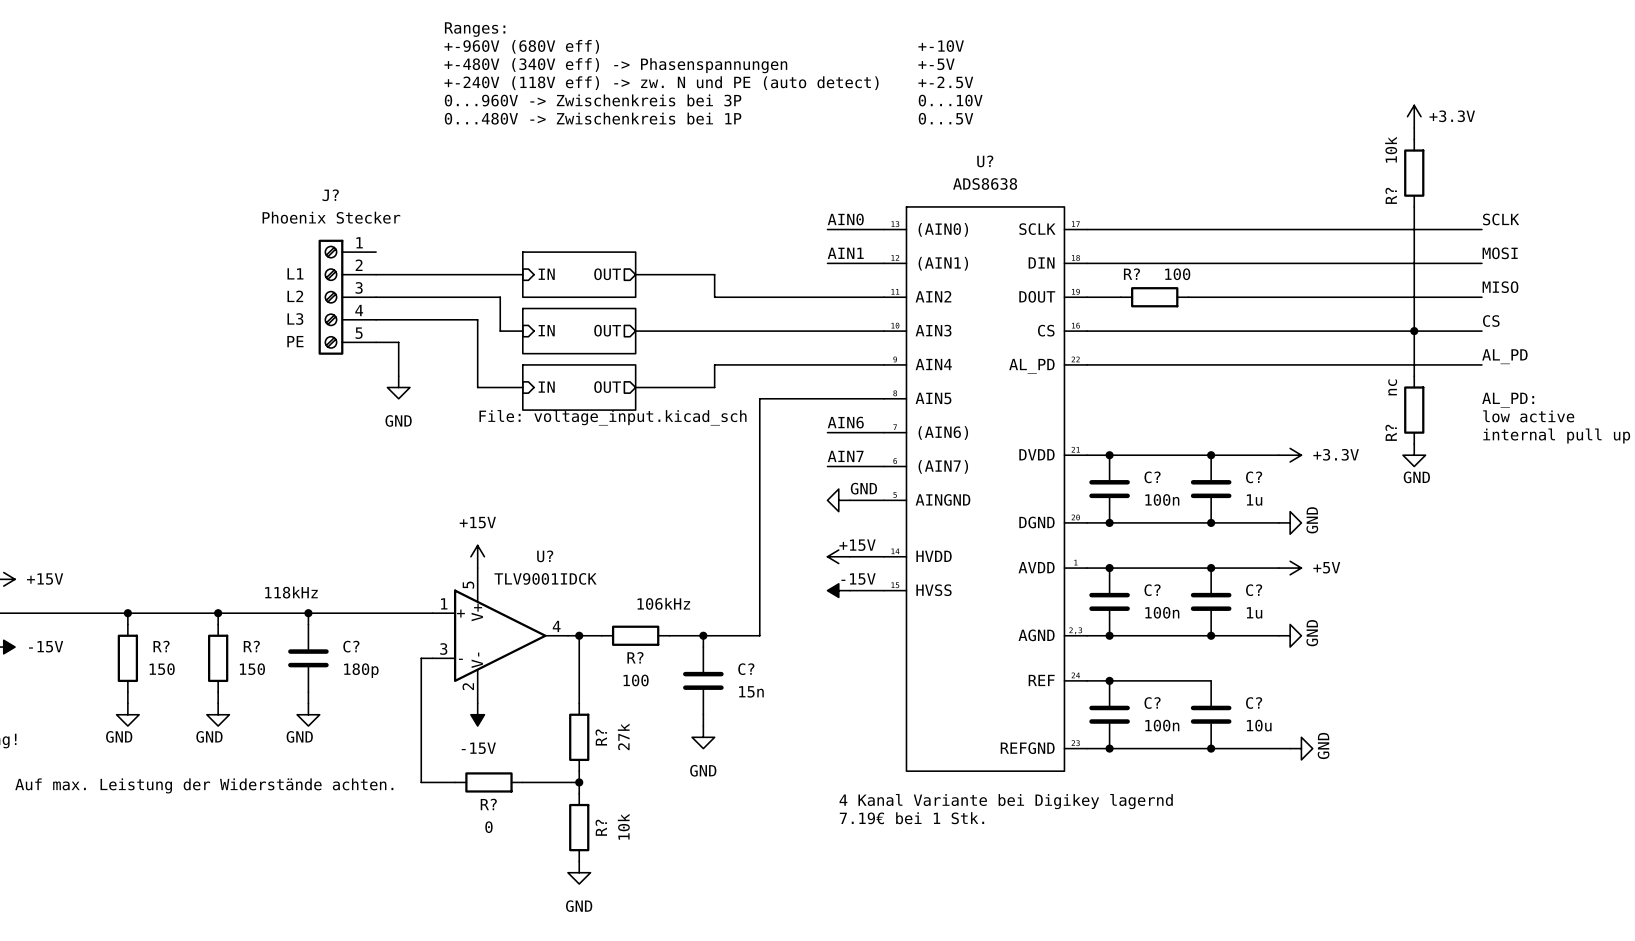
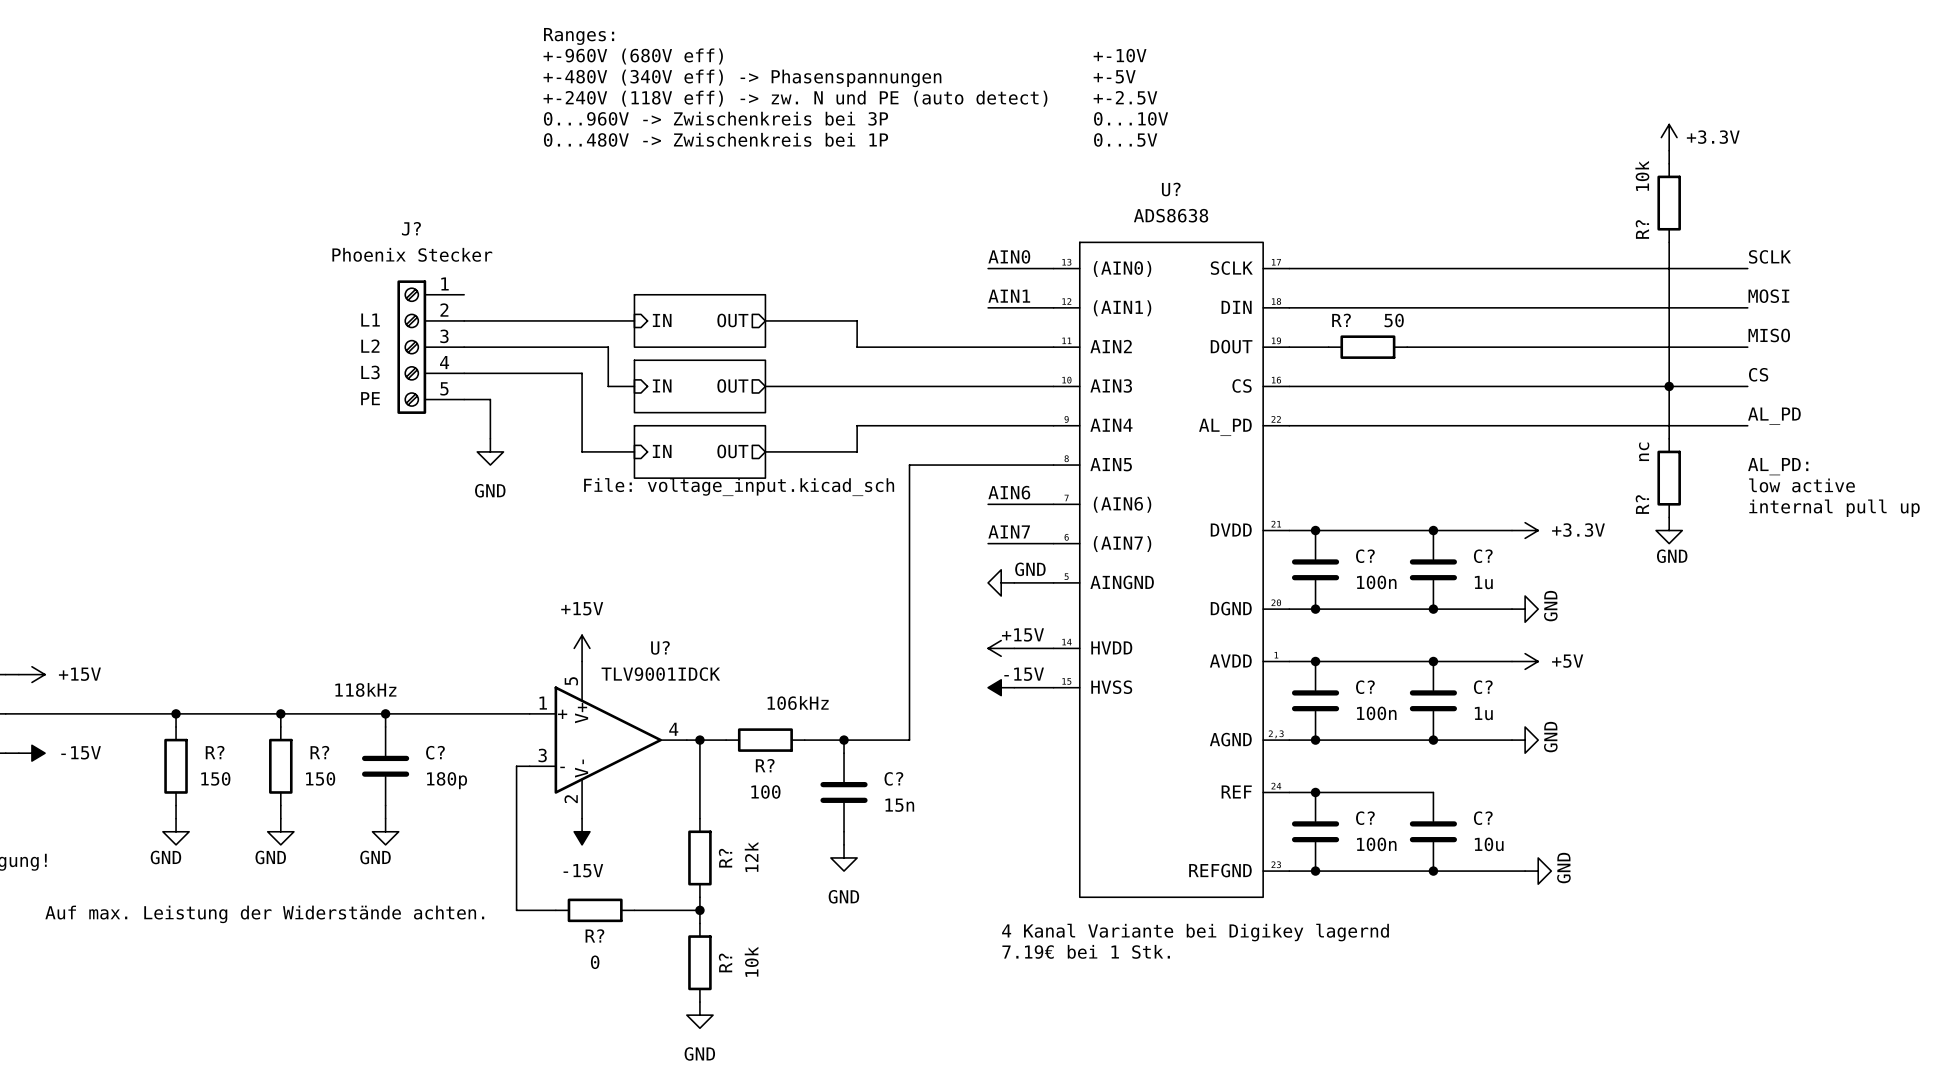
R? value: 100 (1177, 274) -> 50 (1394, 320)
R? value: 27k (623, 736) -> 12k (751, 857)

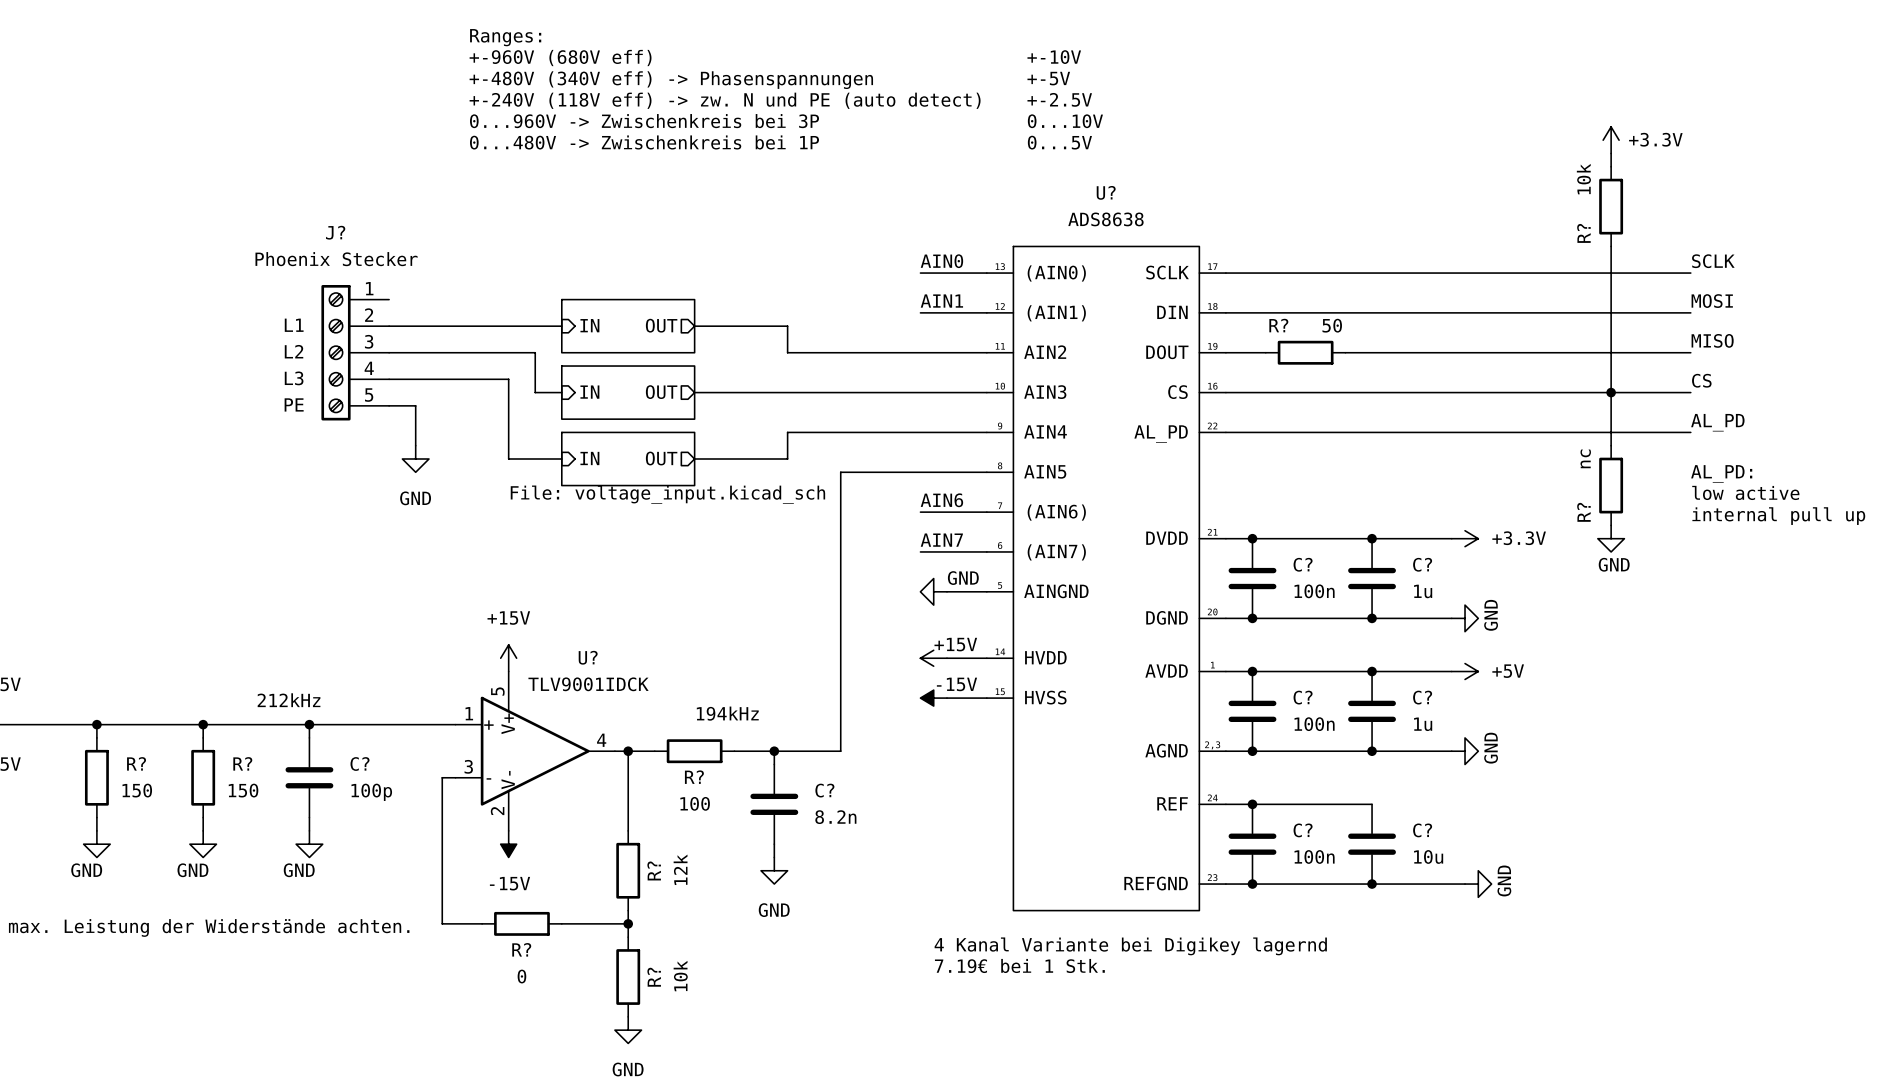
text: 118kHz (365, 689) -> 212kHz (289, 700)
text: 106kHz (798, 703) -> 194kHz (727, 713)
C? value: 180p (447, 780) -> 100p (371, 792)
C? value: 15n (899, 805) -> 8.2n (835, 817)

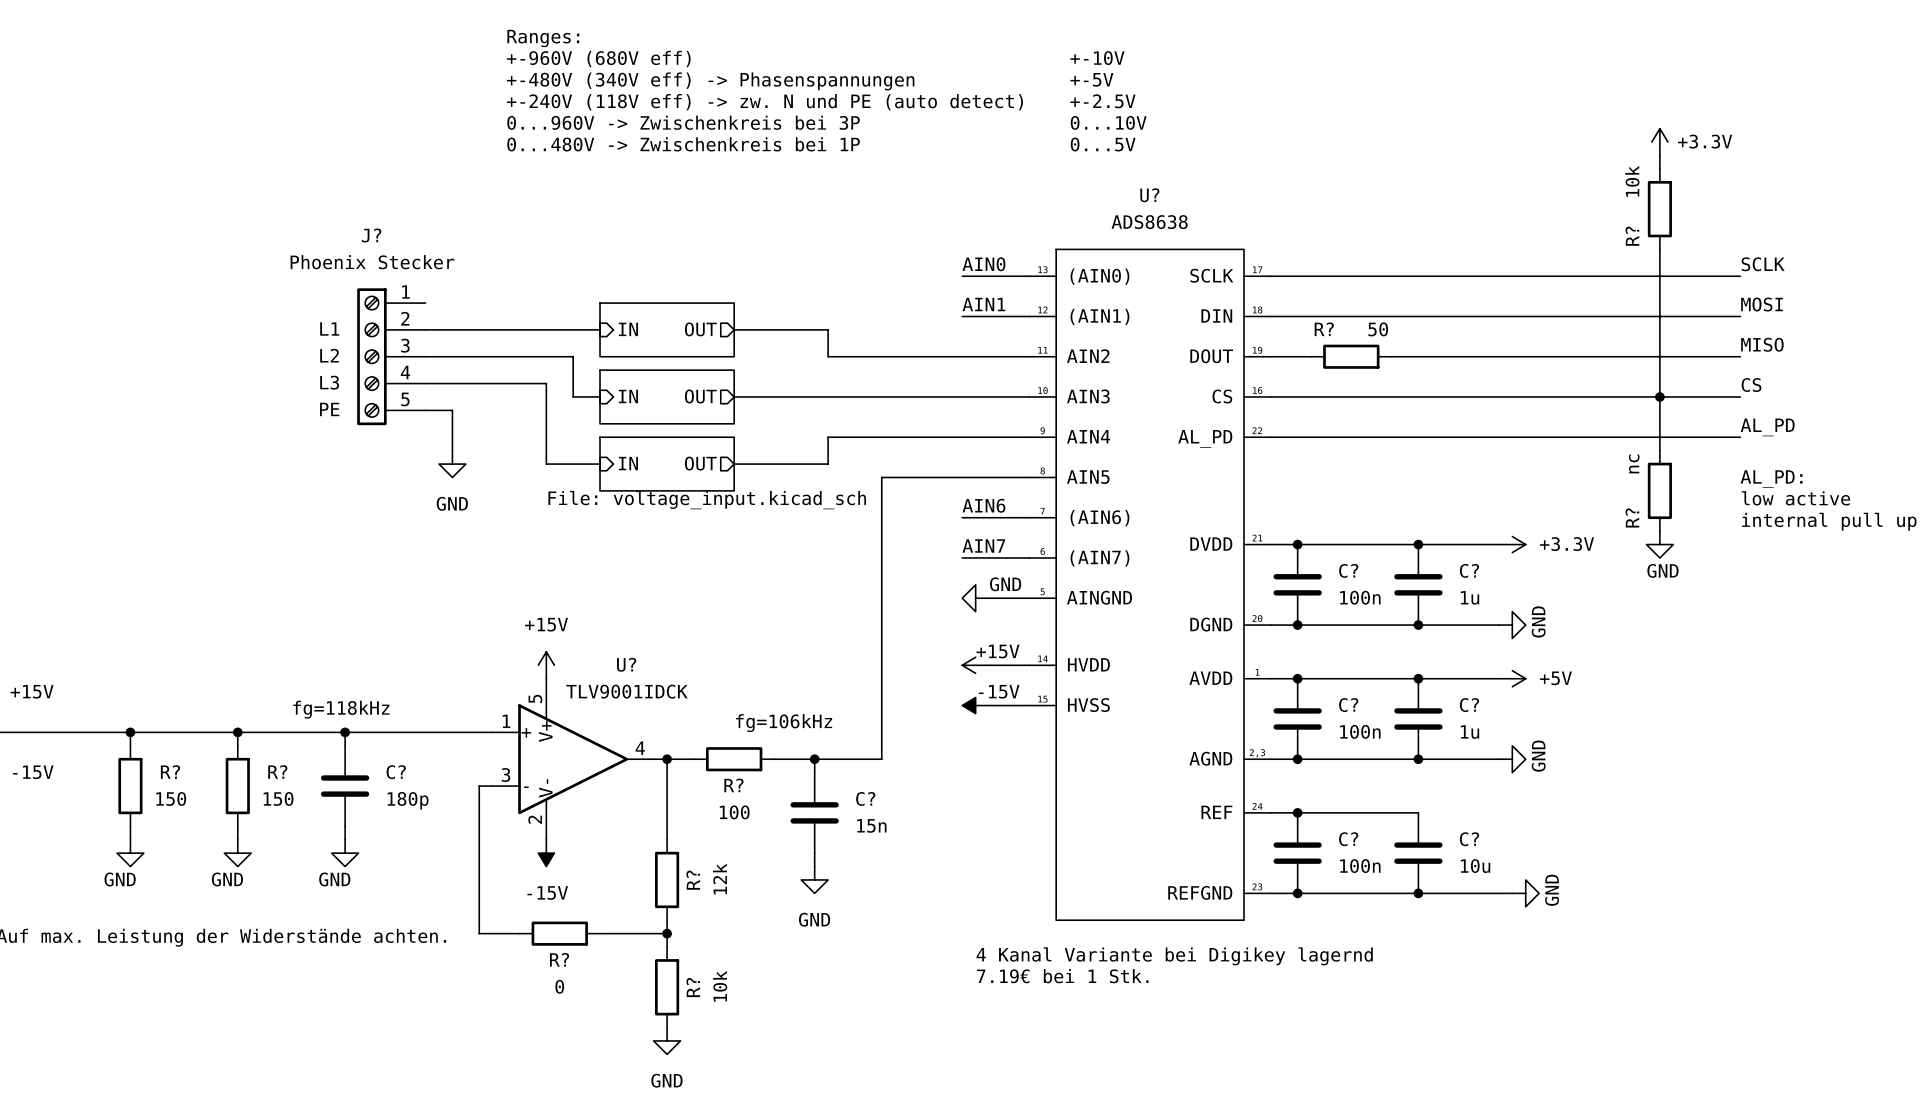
text: 212kHz (289, 700) -> fg=118kHz (341, 709)
text: 194kHz (727, 713) -> fg=106kHz (784, 723)
C? value: 100p (371, 792) -> 180p (408, 800)
C? value: 8.2n (835, 817) -> 15n (871, 825)

